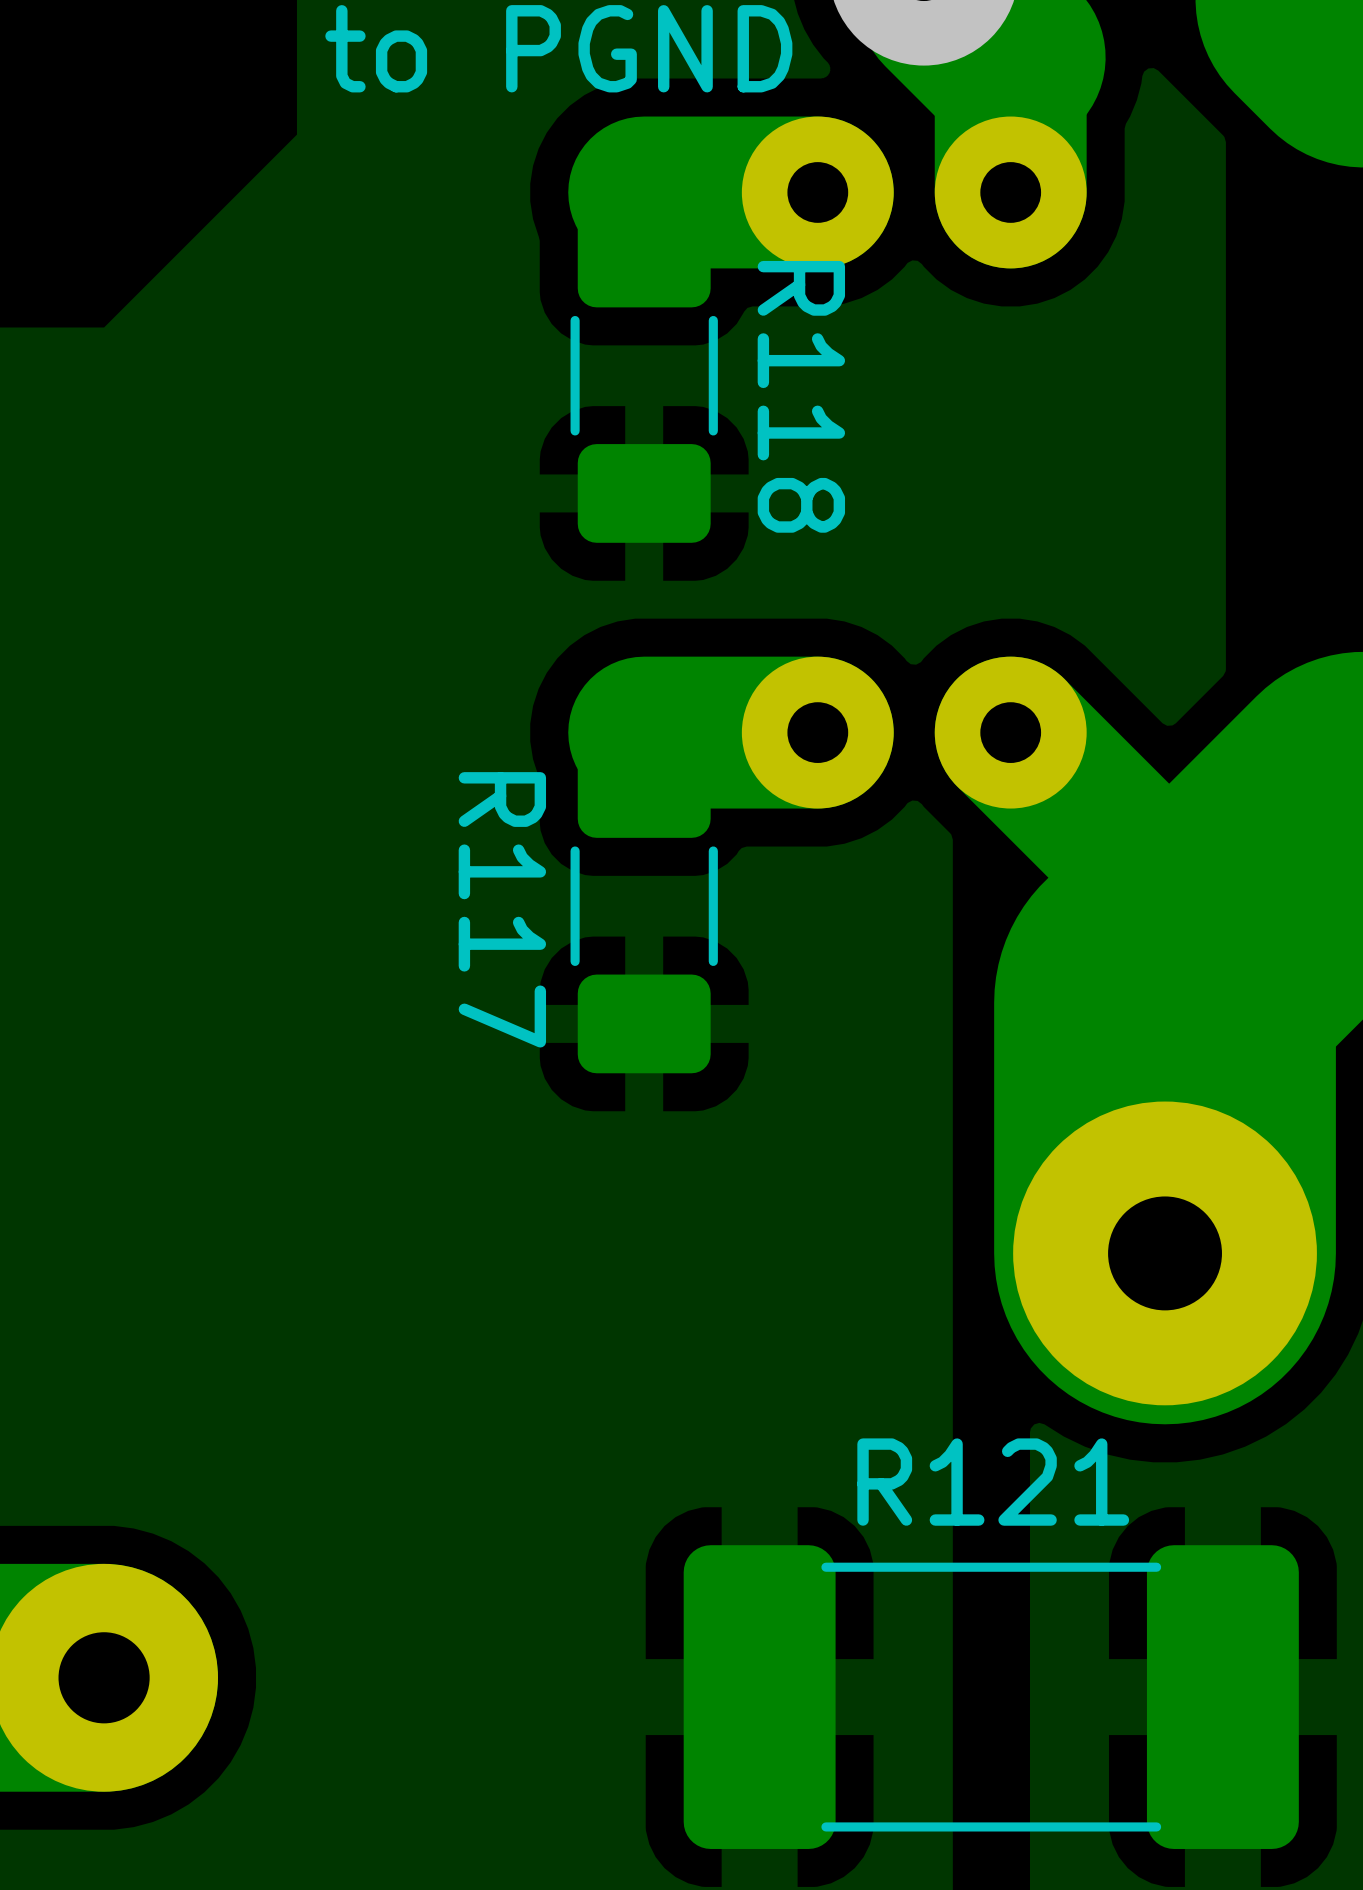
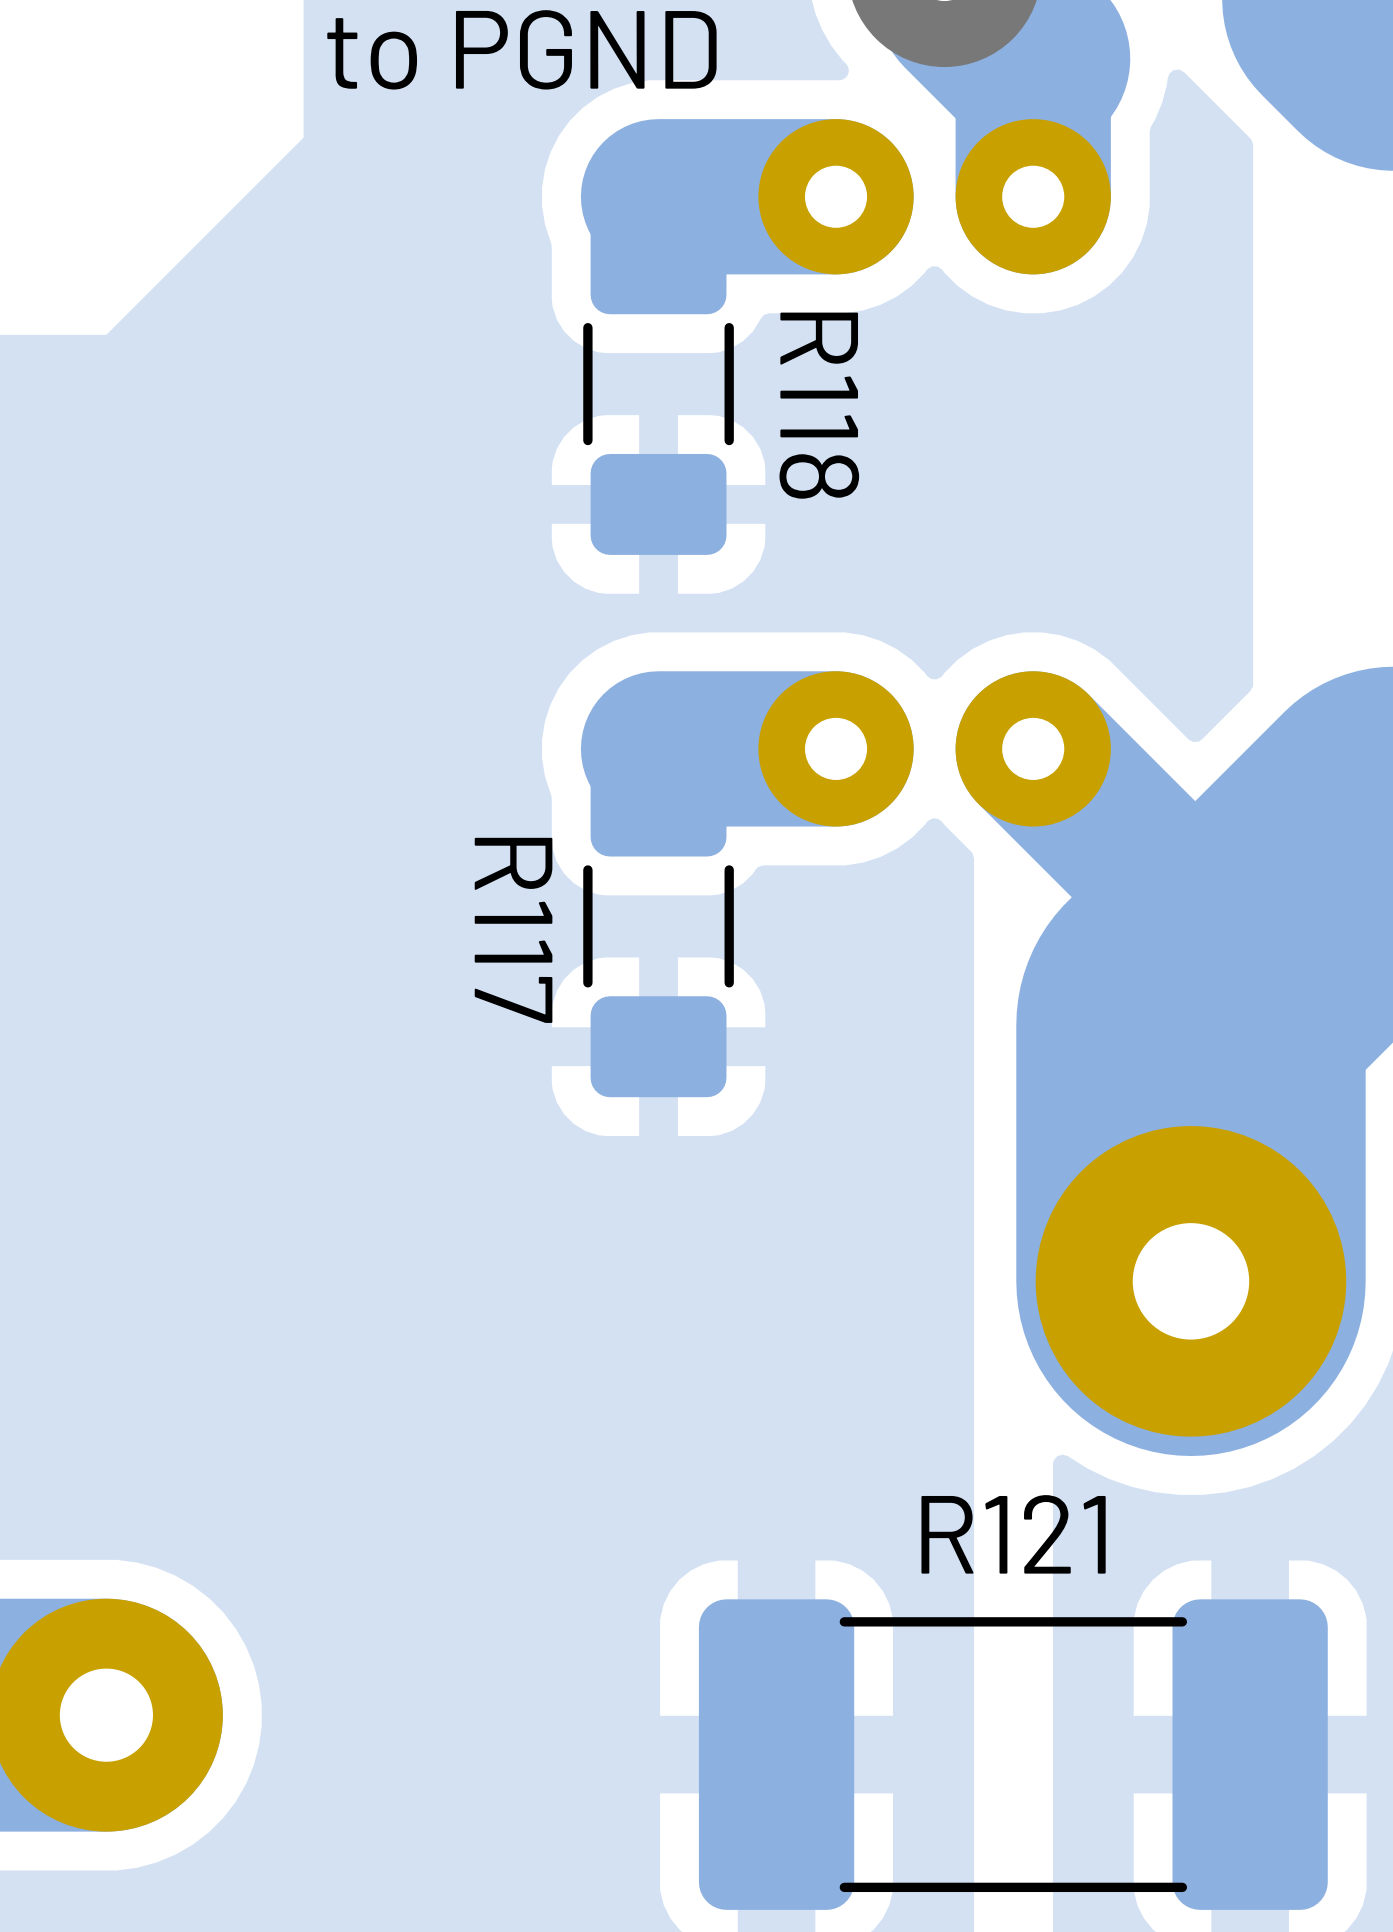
R121 position: (991, 1697) -> (1013, 1754)

